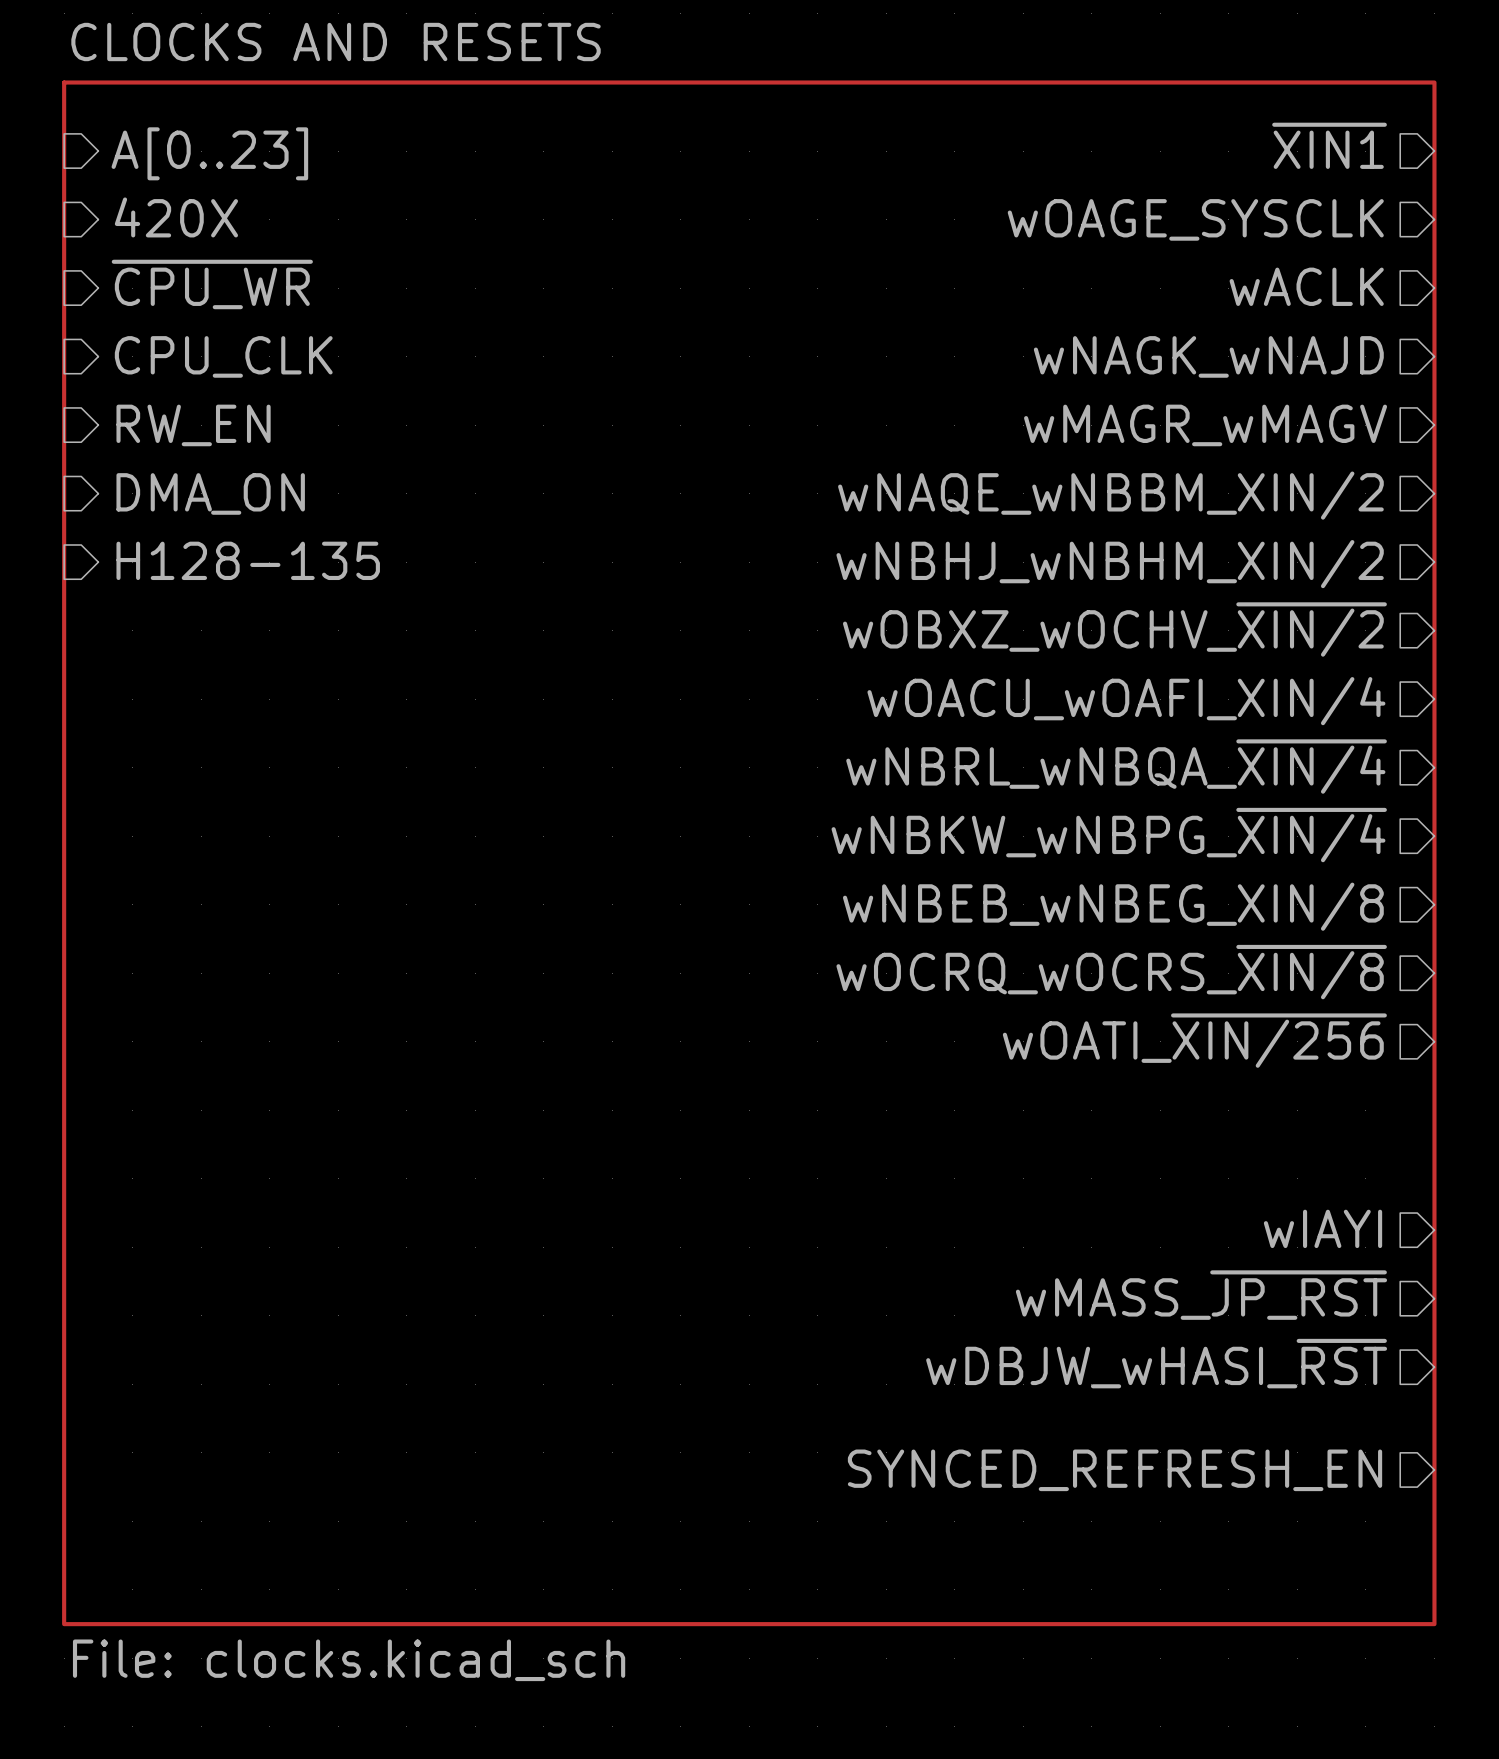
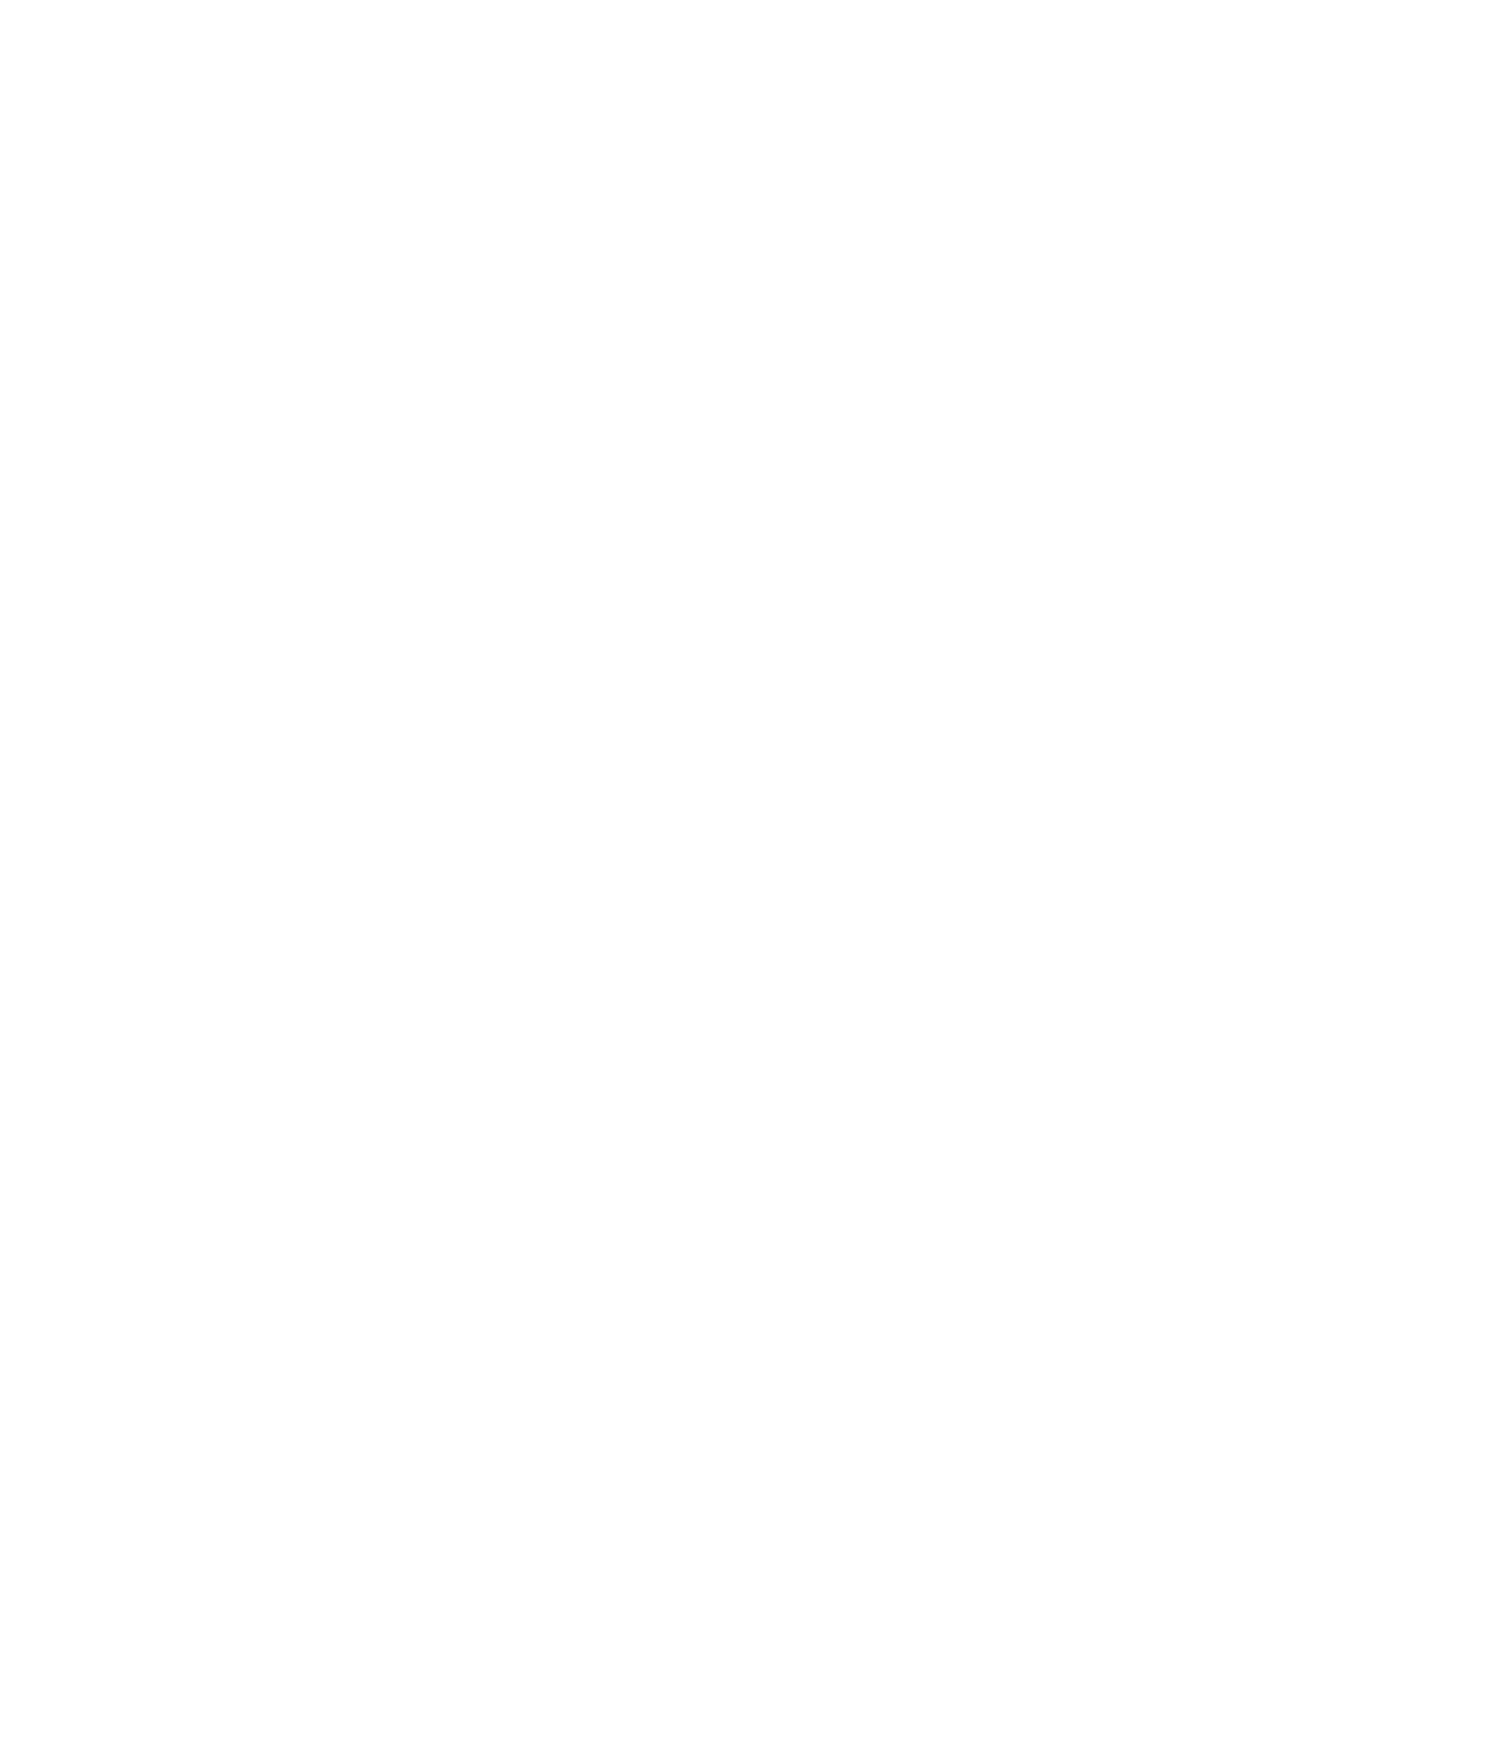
sheet pin: ~{XIN1} (1329, 145) -> none
sheet pin: A[0..23] (209, 153) -> none
sheet pin: 420X (176, 217) -> none
sheet pin: wOAGE_SYSCLK (1195, 219) -> none
sheet pin: ~{CPU_WR} (212, 284) -> none
sheet pin: wACLK (1306, 286) -> none
sheet pin: CPU_CLK (223, 356) -> none
sheet pin: wNAGK_wNAJD (1208, 356) -> none
sheet pin: RW_EN (193, 425) -> none
sheet pin: wMAGR_wMAGV (1205, 425) -> none
sheet pin: DMA_ON (210, 493) -> none
sheet pin: wNAQE_wNBBM_XIN/2 (1110, 495) -> none
sheet pin: H128-135 (248, 560) -> none
sheet pin: wNBHJ_wNBHM_XIN/2 (1110, 564) -> none
sheet pin: wOBXZ_wOCHV_~{XIN/2} (1114, 629) -> none
sheet pin: wOACU_wOAFI_XIN/4 (1126, 701) -> none
sheet pin: wNBRL_wNBQA_~{XIN/4} (1116, 766) -> none
sheet pin: wNBKW_wNBPG_~{XIN/4} (1109, 835) -> none
sheet CLOCKS AND RESETS: File: clocks.kicad_sch (749, 853) -> none
sheet pin: wNBEB_wNBEG_XIN/8 (1113, 906) -> none
sheet pin: wOCRQ_wOCRS_~{XIN/8} (1111, 972) -> none
sheet pin: wOATI_~{XIN/256} (1194, 1040) -> none
sheet pin: wIAYI (1323, 1228) -> none
sheet pin: wMASS_~{JP_RST} (1201, 1295) -> none
sheet pin: wDBJW_wHASI_~{RST} (1156, 1363) -> none
sheet pin: SYNCED_REFRESH_EN (1115, 1470) -> none

